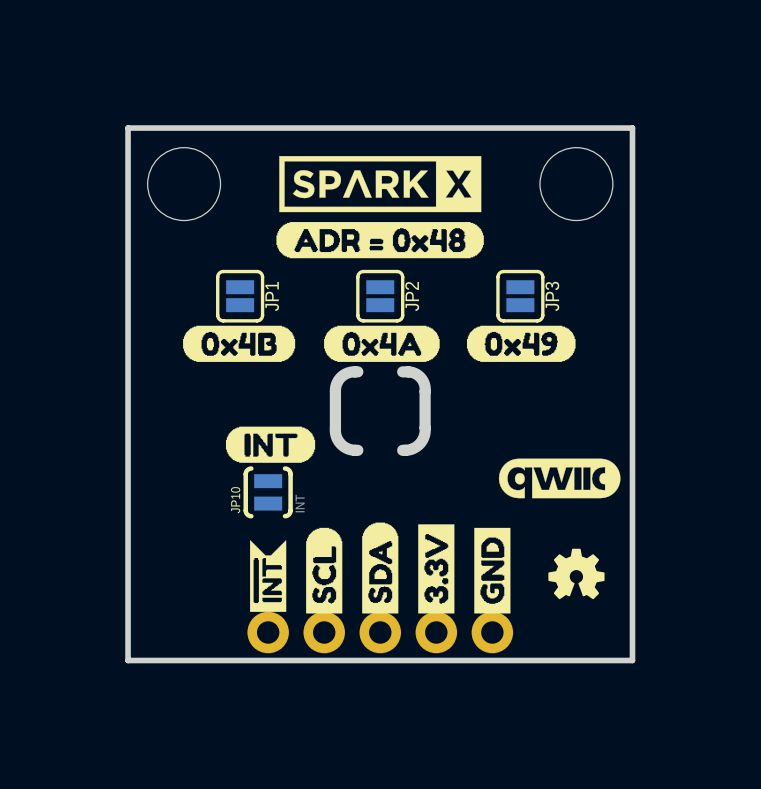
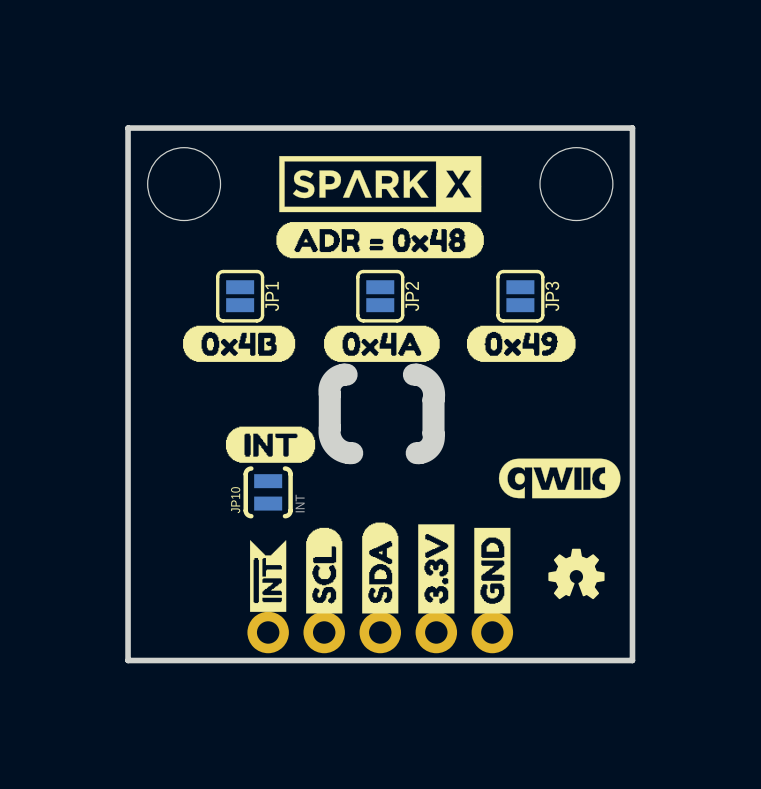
board edge: (357, 371) (344, 374) (336, 384) (335, 430) (337, 439) (341, 445) (350, 449) (357, 450) -> none
board edge: (402, 371) (417, 375) (423, 381) (425, 389) (423, 437) (414, 447) (402, 450) -> none
board edge: none -> (346, 374) (336, 377) (330, 386) (329, 433) (331, 440) (337, 448) (352, 453)
board edge: none -> (413, 374) (427, 379) (432, 387) (434, 395) (433, 441) (426, 450) (416, 453)

